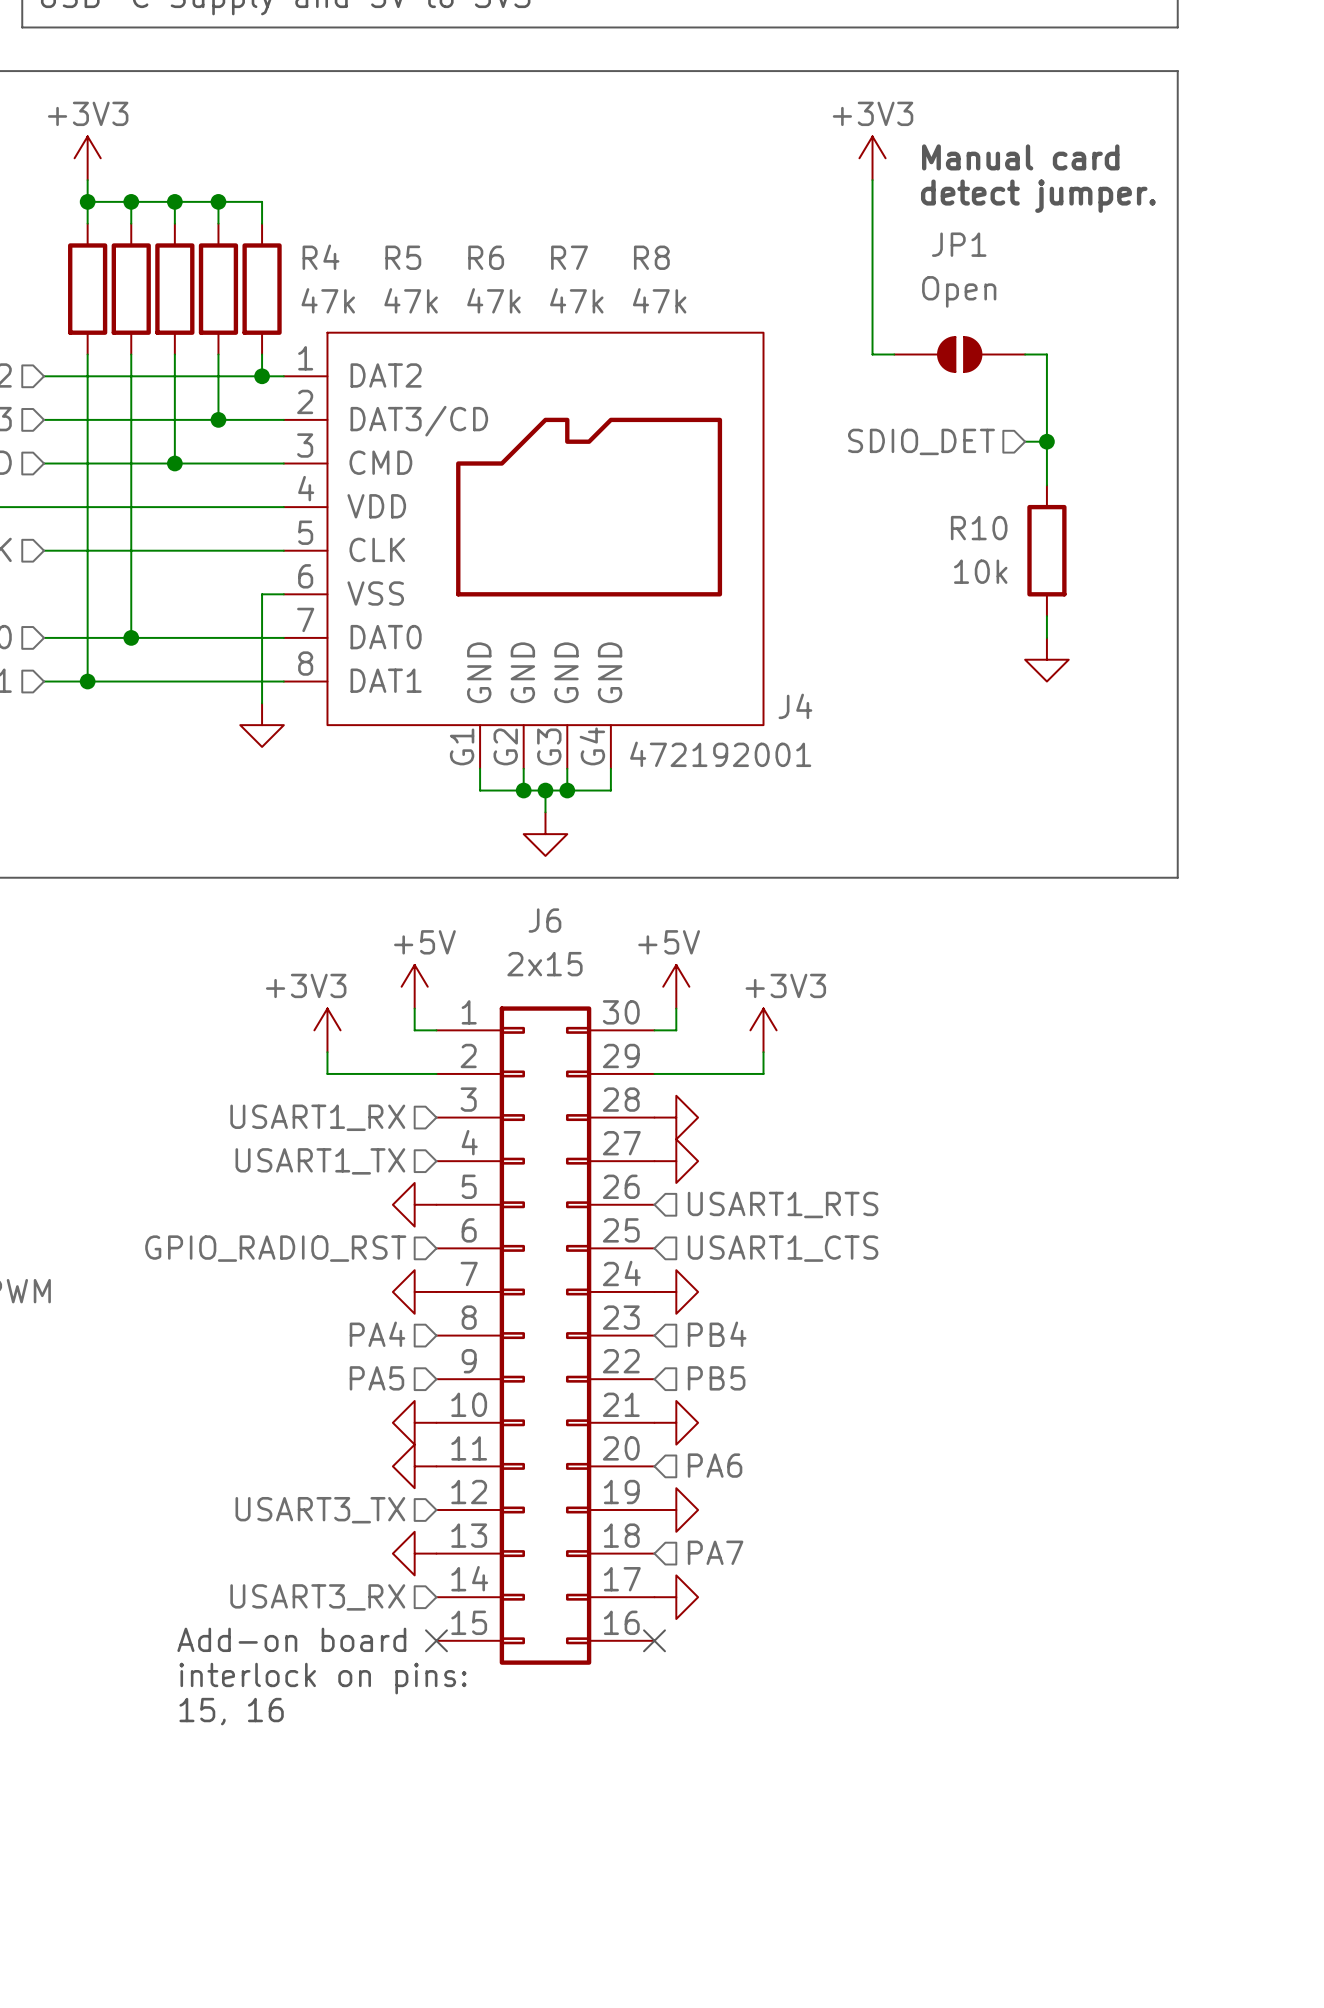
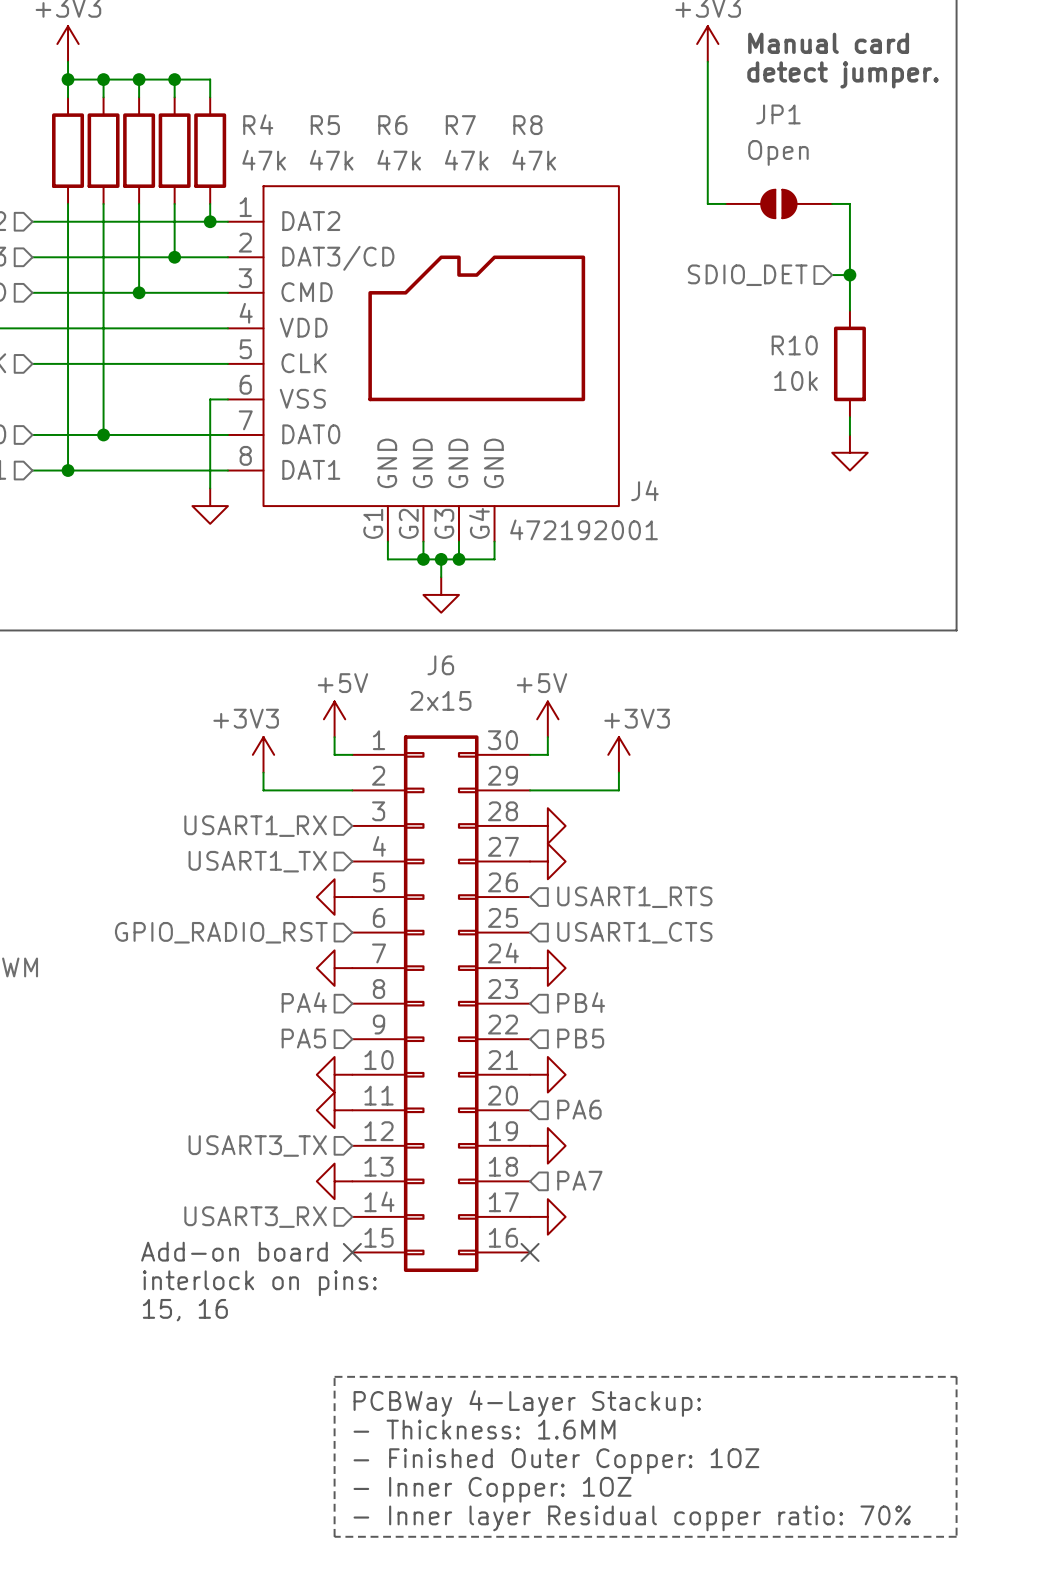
line: none -> (334, 1376) (956, 1376) (956, 1536) (334, 1536) (334, 1376)
text: none -> PCBWay 4-Layer Stackup: (527, 1403)
text: none -> - Thickness: 1.6MM (484, 1429)
text: none -> - Finished Outer Copper: 1OZ (556, 1461)
text: none -> - Inner Copper: 1OZ (492, 1489)
text: none -> - Inner layer Residual copper ratio: 70% (632, 1518)

